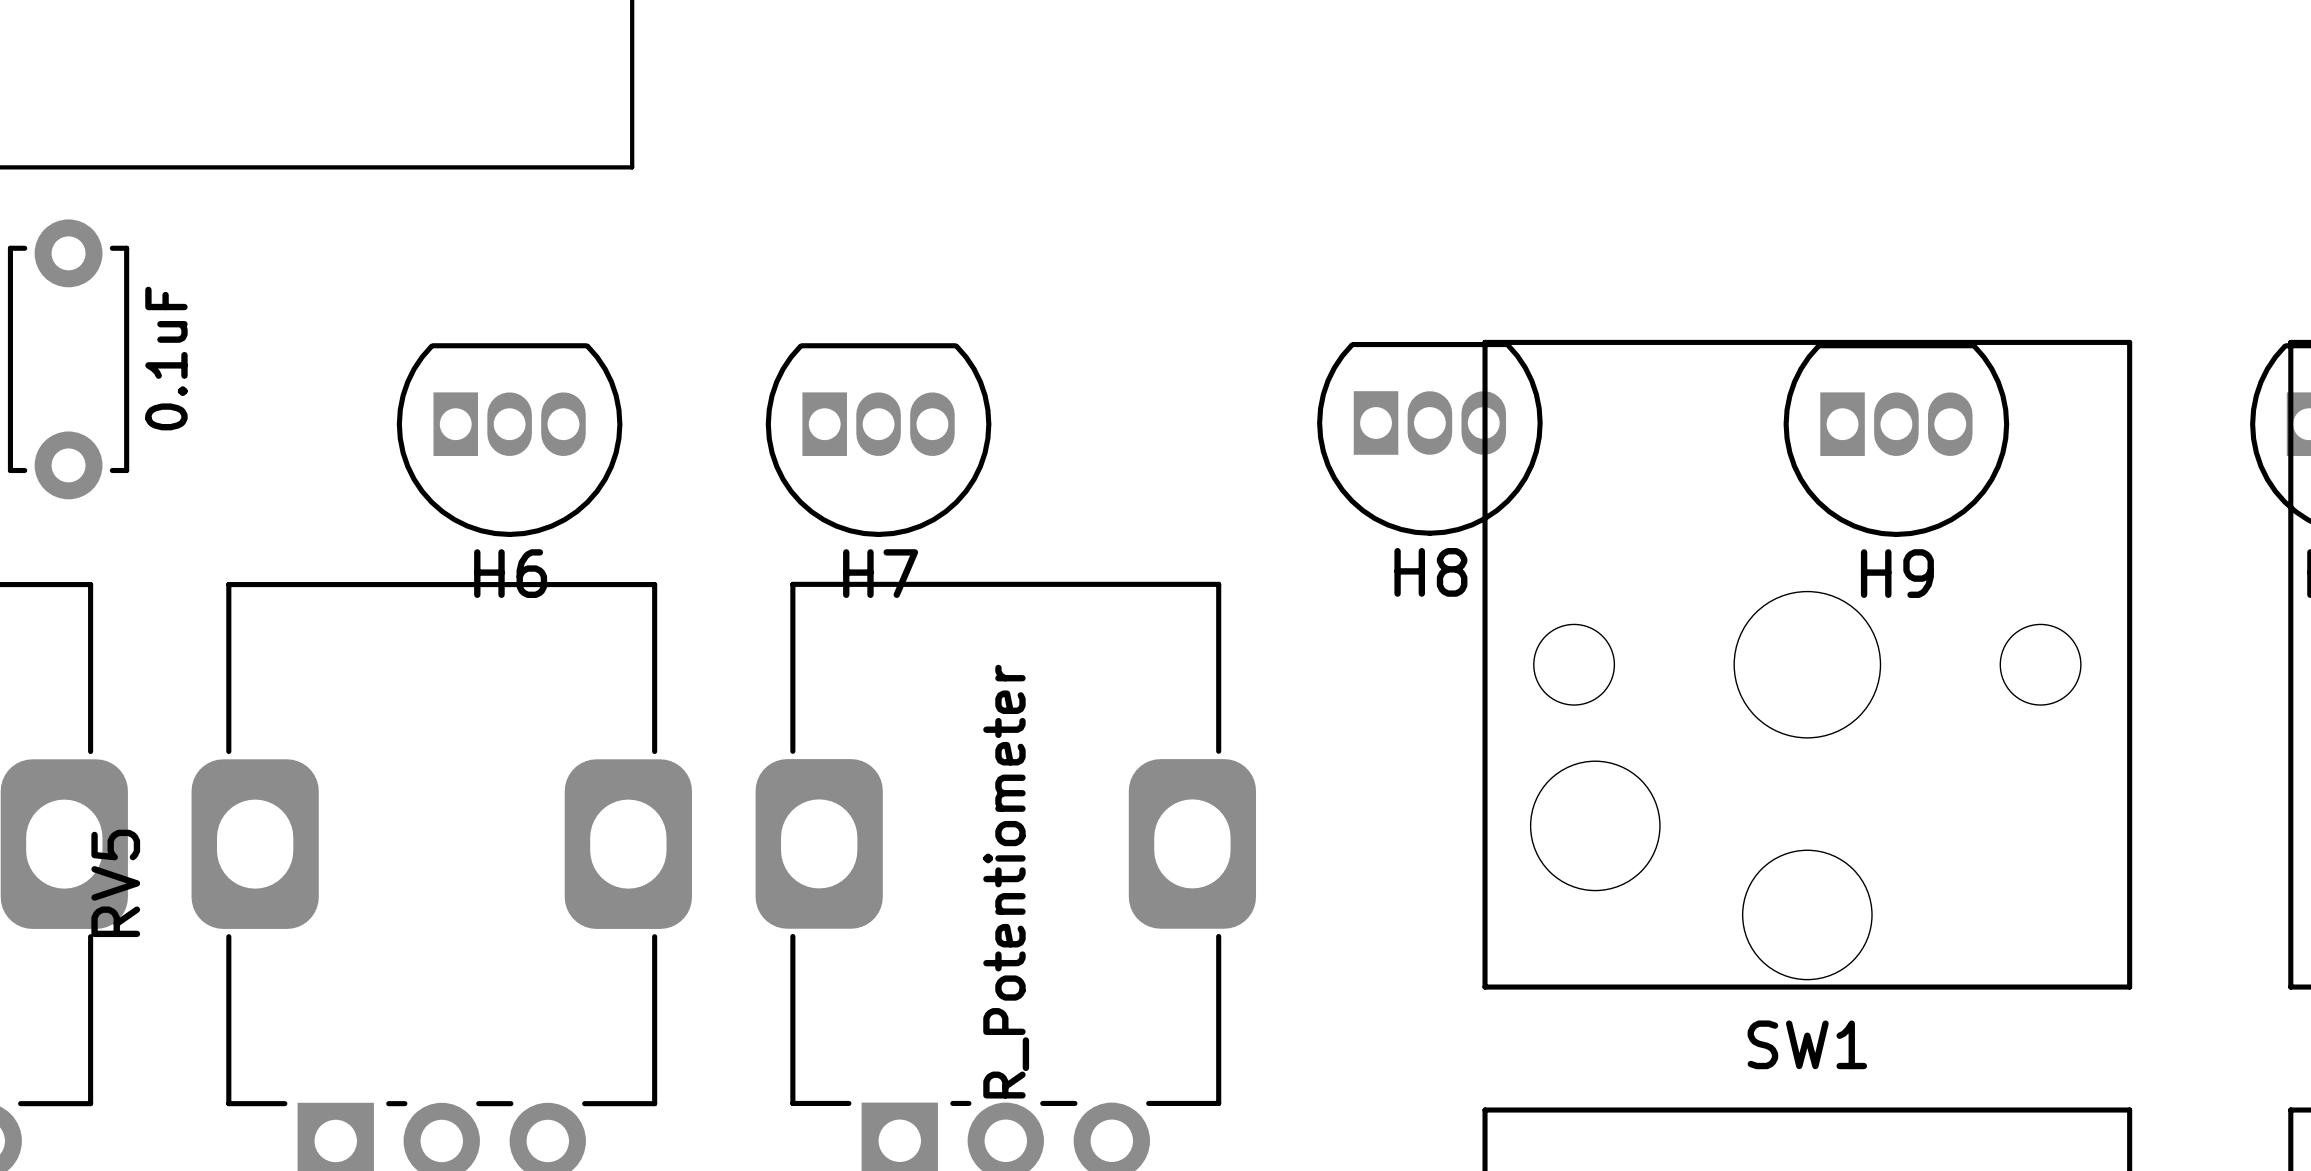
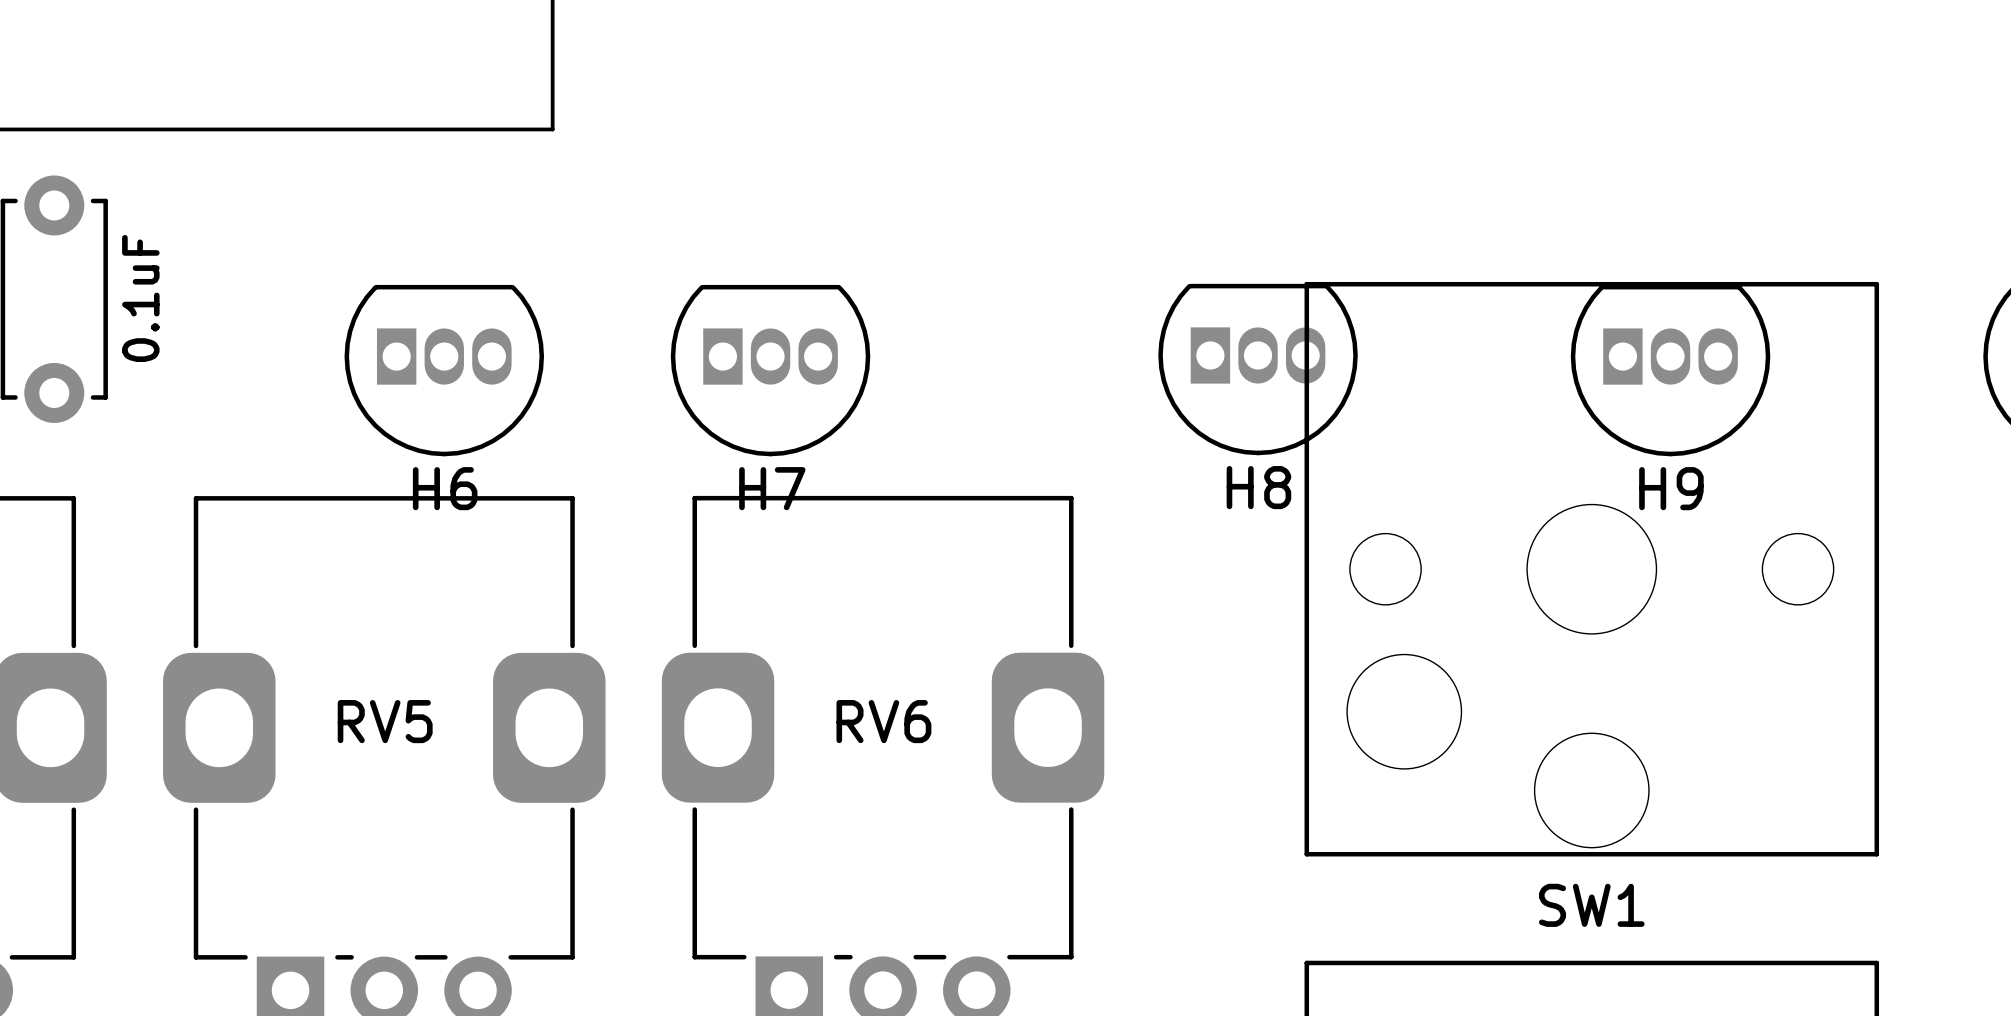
RV6 name: none -> RV6 (883, 721)
RV6 value: R_Potentiometer (1006, 881) -> none
RV5 name rotation: 0° (115, 883) -> 90° clockwise (385, 721)
RV5 name position: RV5 (115, 883) -> RV5 (385, 721)

